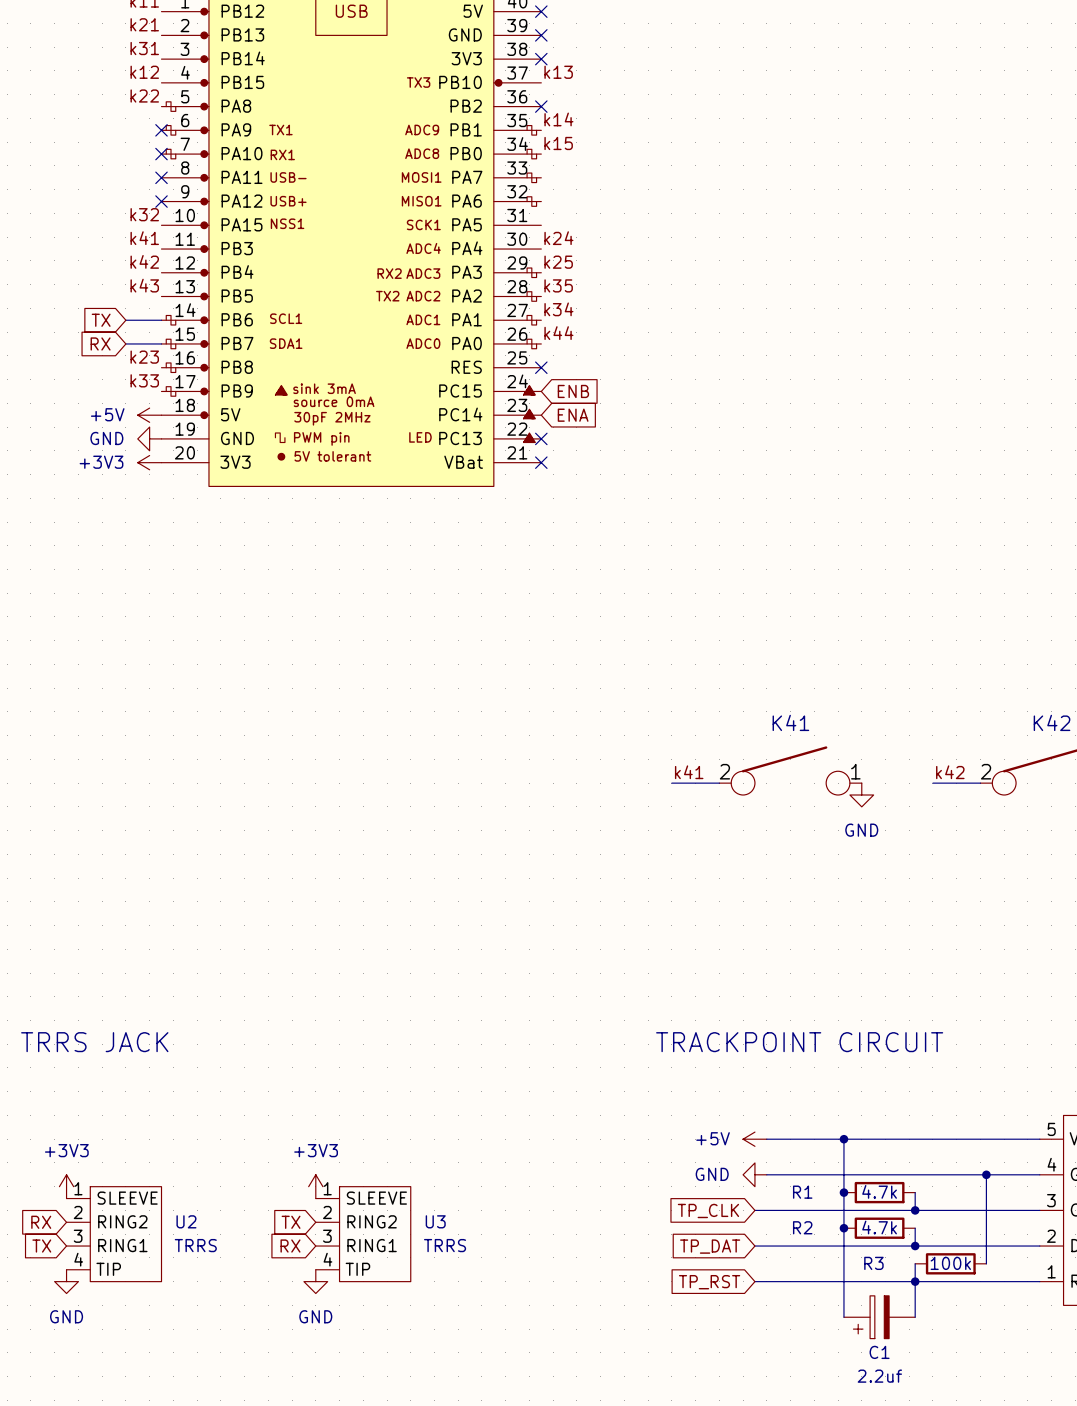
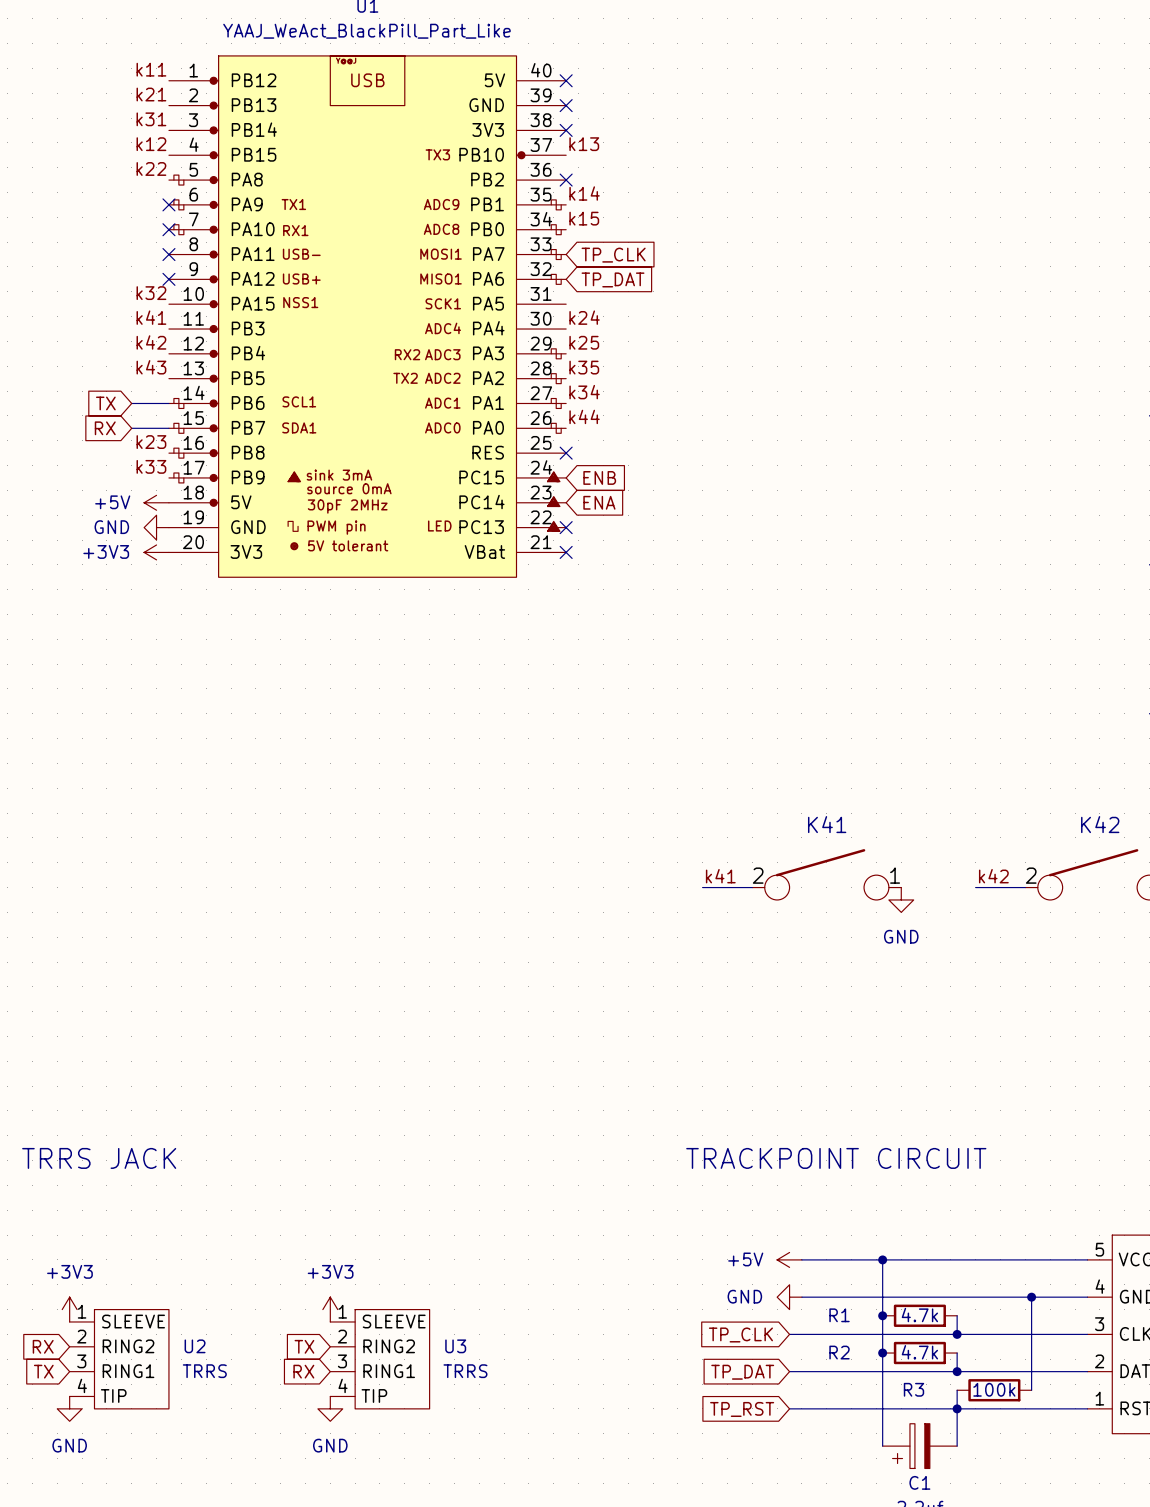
global label: none -> TP_CLK (613, 255)
global label: none -> TP_DAT (613, 279)

